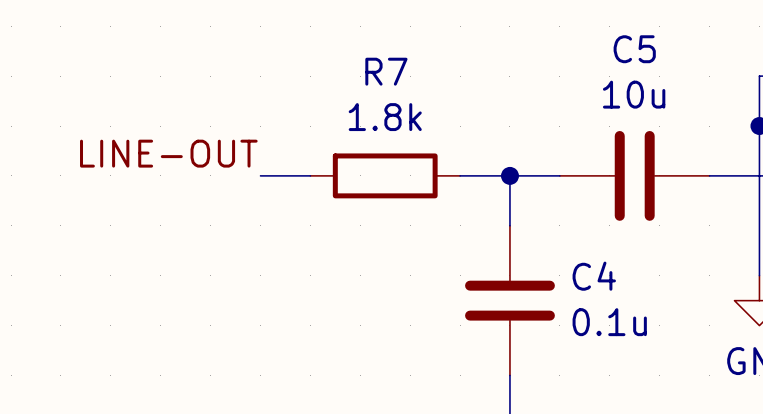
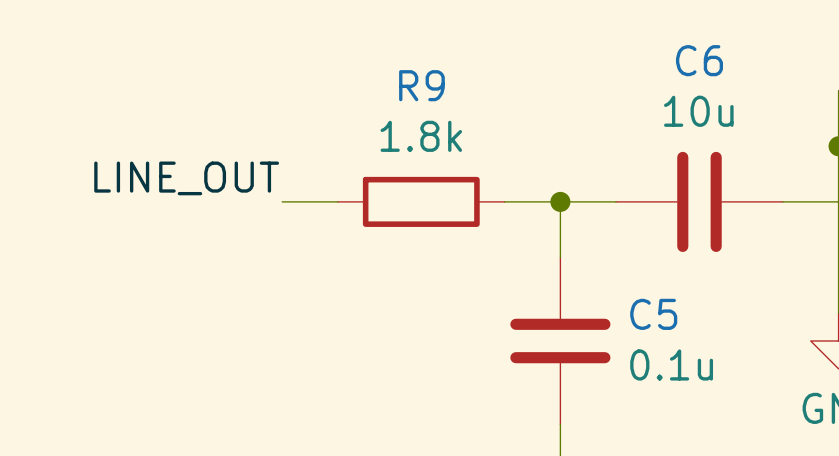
C5 name: C5 (634, 49) -> C6 (699, 60)
R7 name: R7 (386, 71) -> R9 (421, 85)
label: LINE-OUT (168, 153) -> LINE_OUT (186, 178)
C4 name: C4 (594, 276) -> C5 (653, 314)

